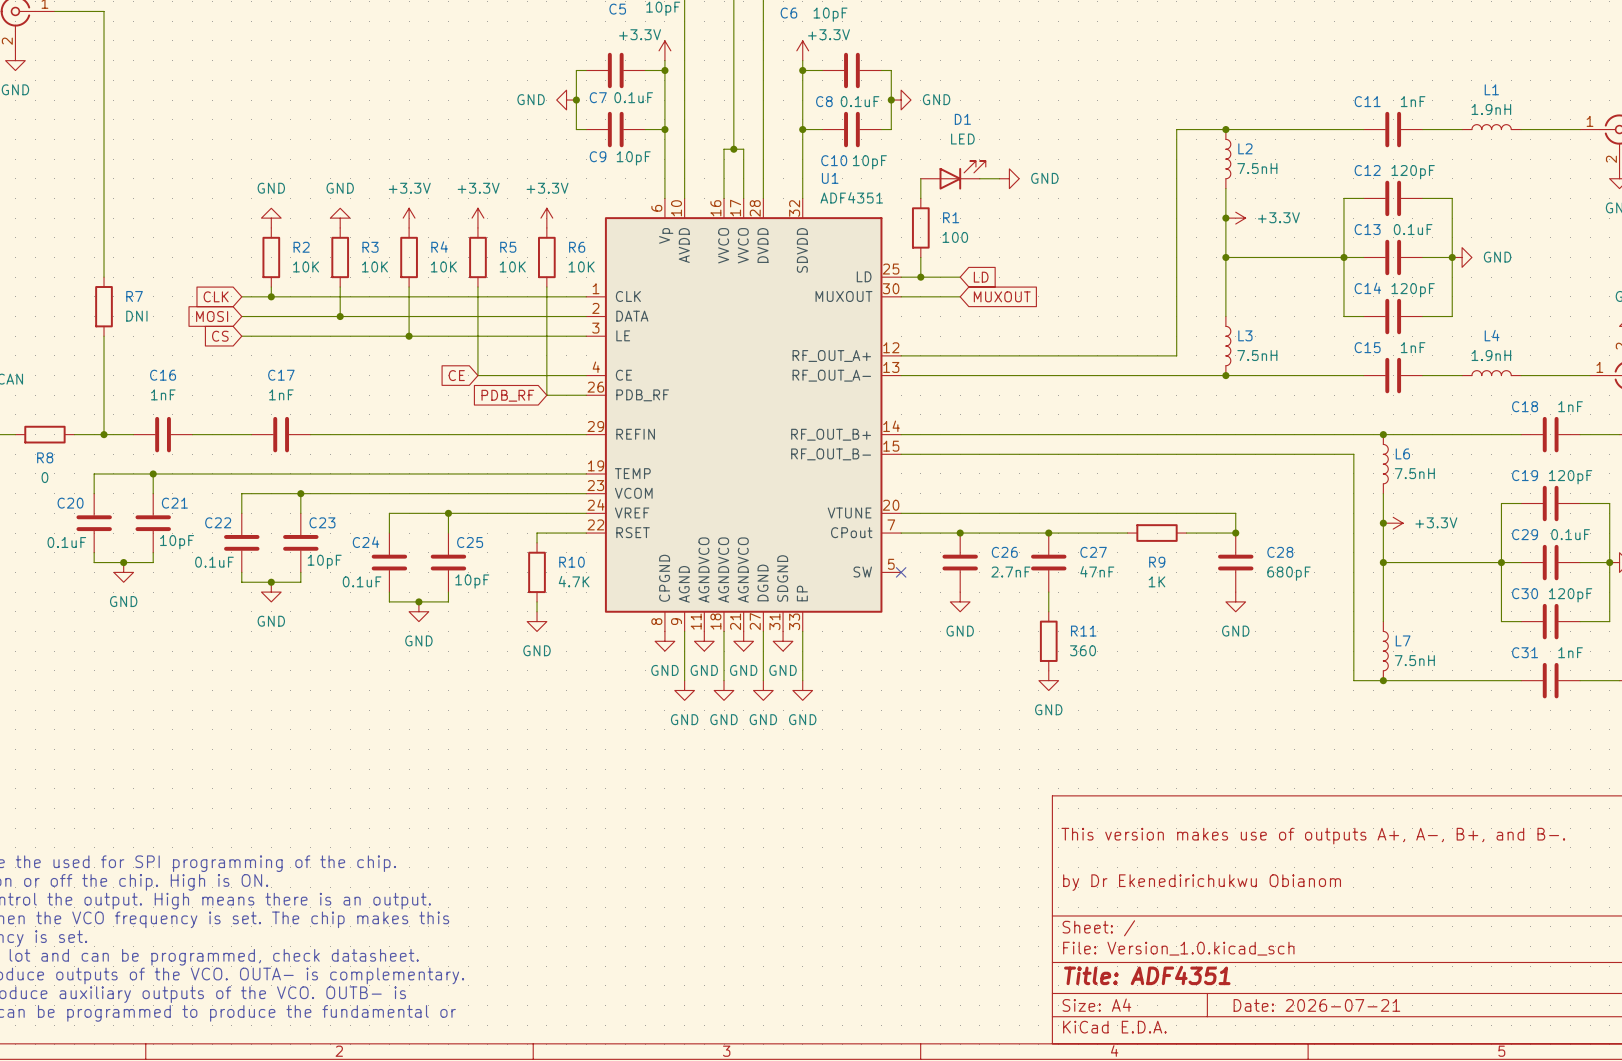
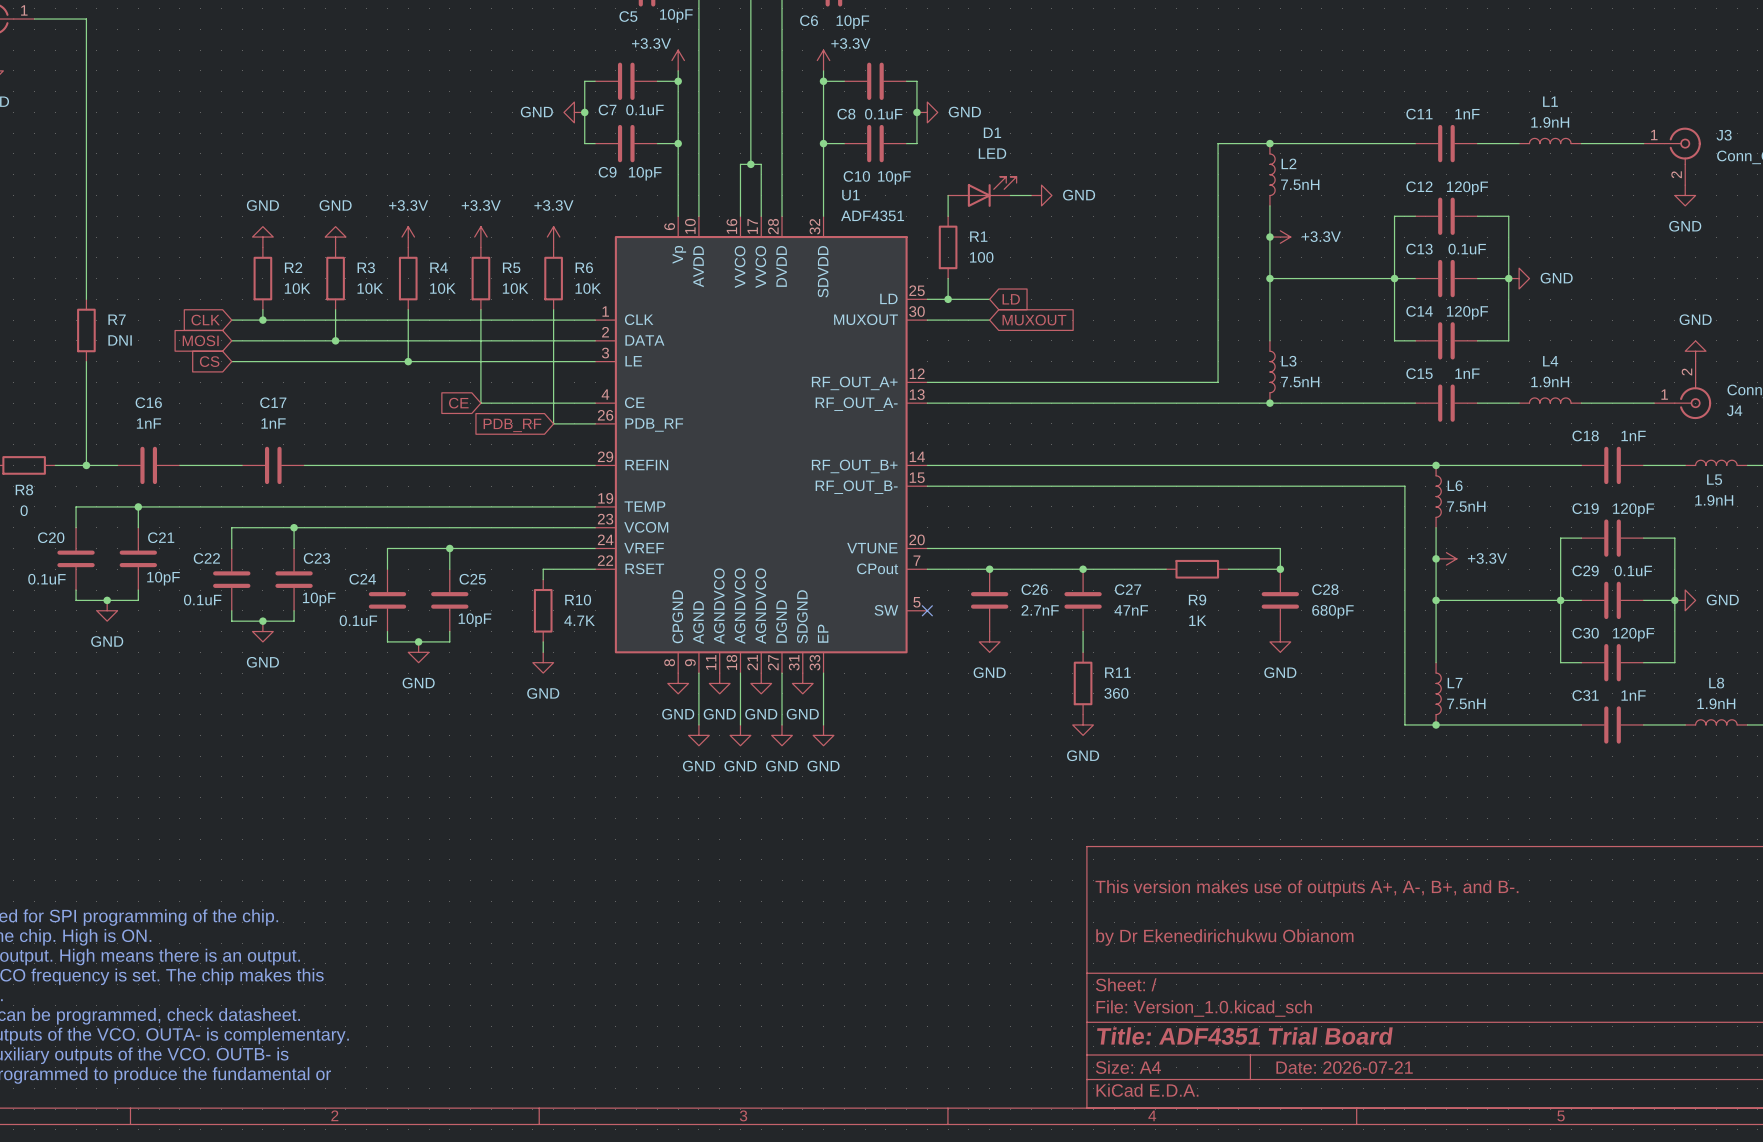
title block: Title: ADF4351 (1147, 975) -> Title: ADF4351 Trial Board (1244, 1036)

